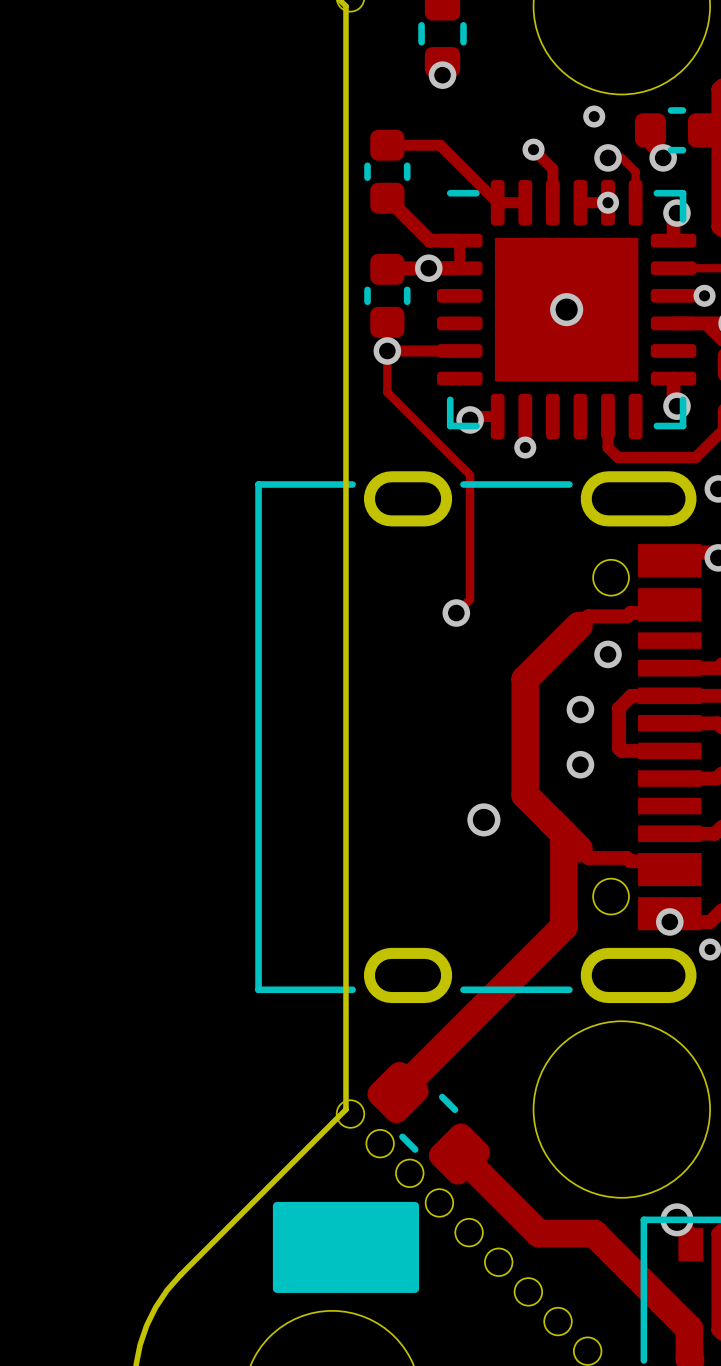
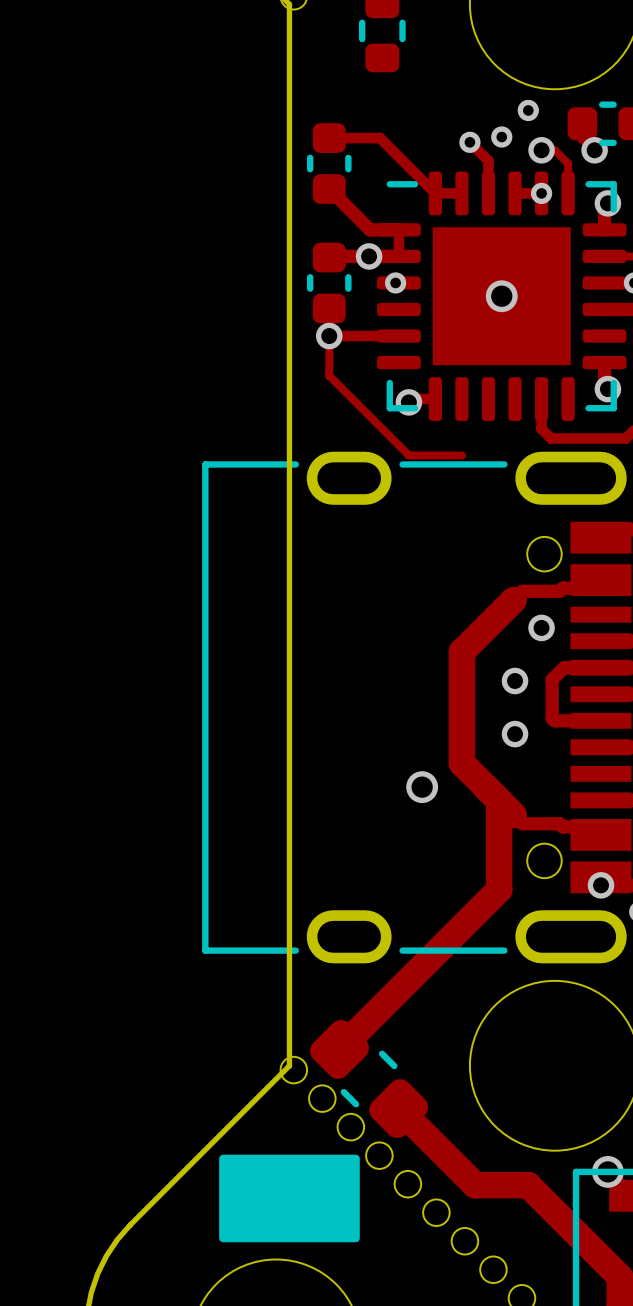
via: (442, 75) -> none
via: none -> (501, 137)
via: none -> (395, 282)
via: (525, 447) -> none
track: (470, 475) (470, 599) (456, 613) -> (408, 455) (461, 455)
via: (456, 613) -> none

